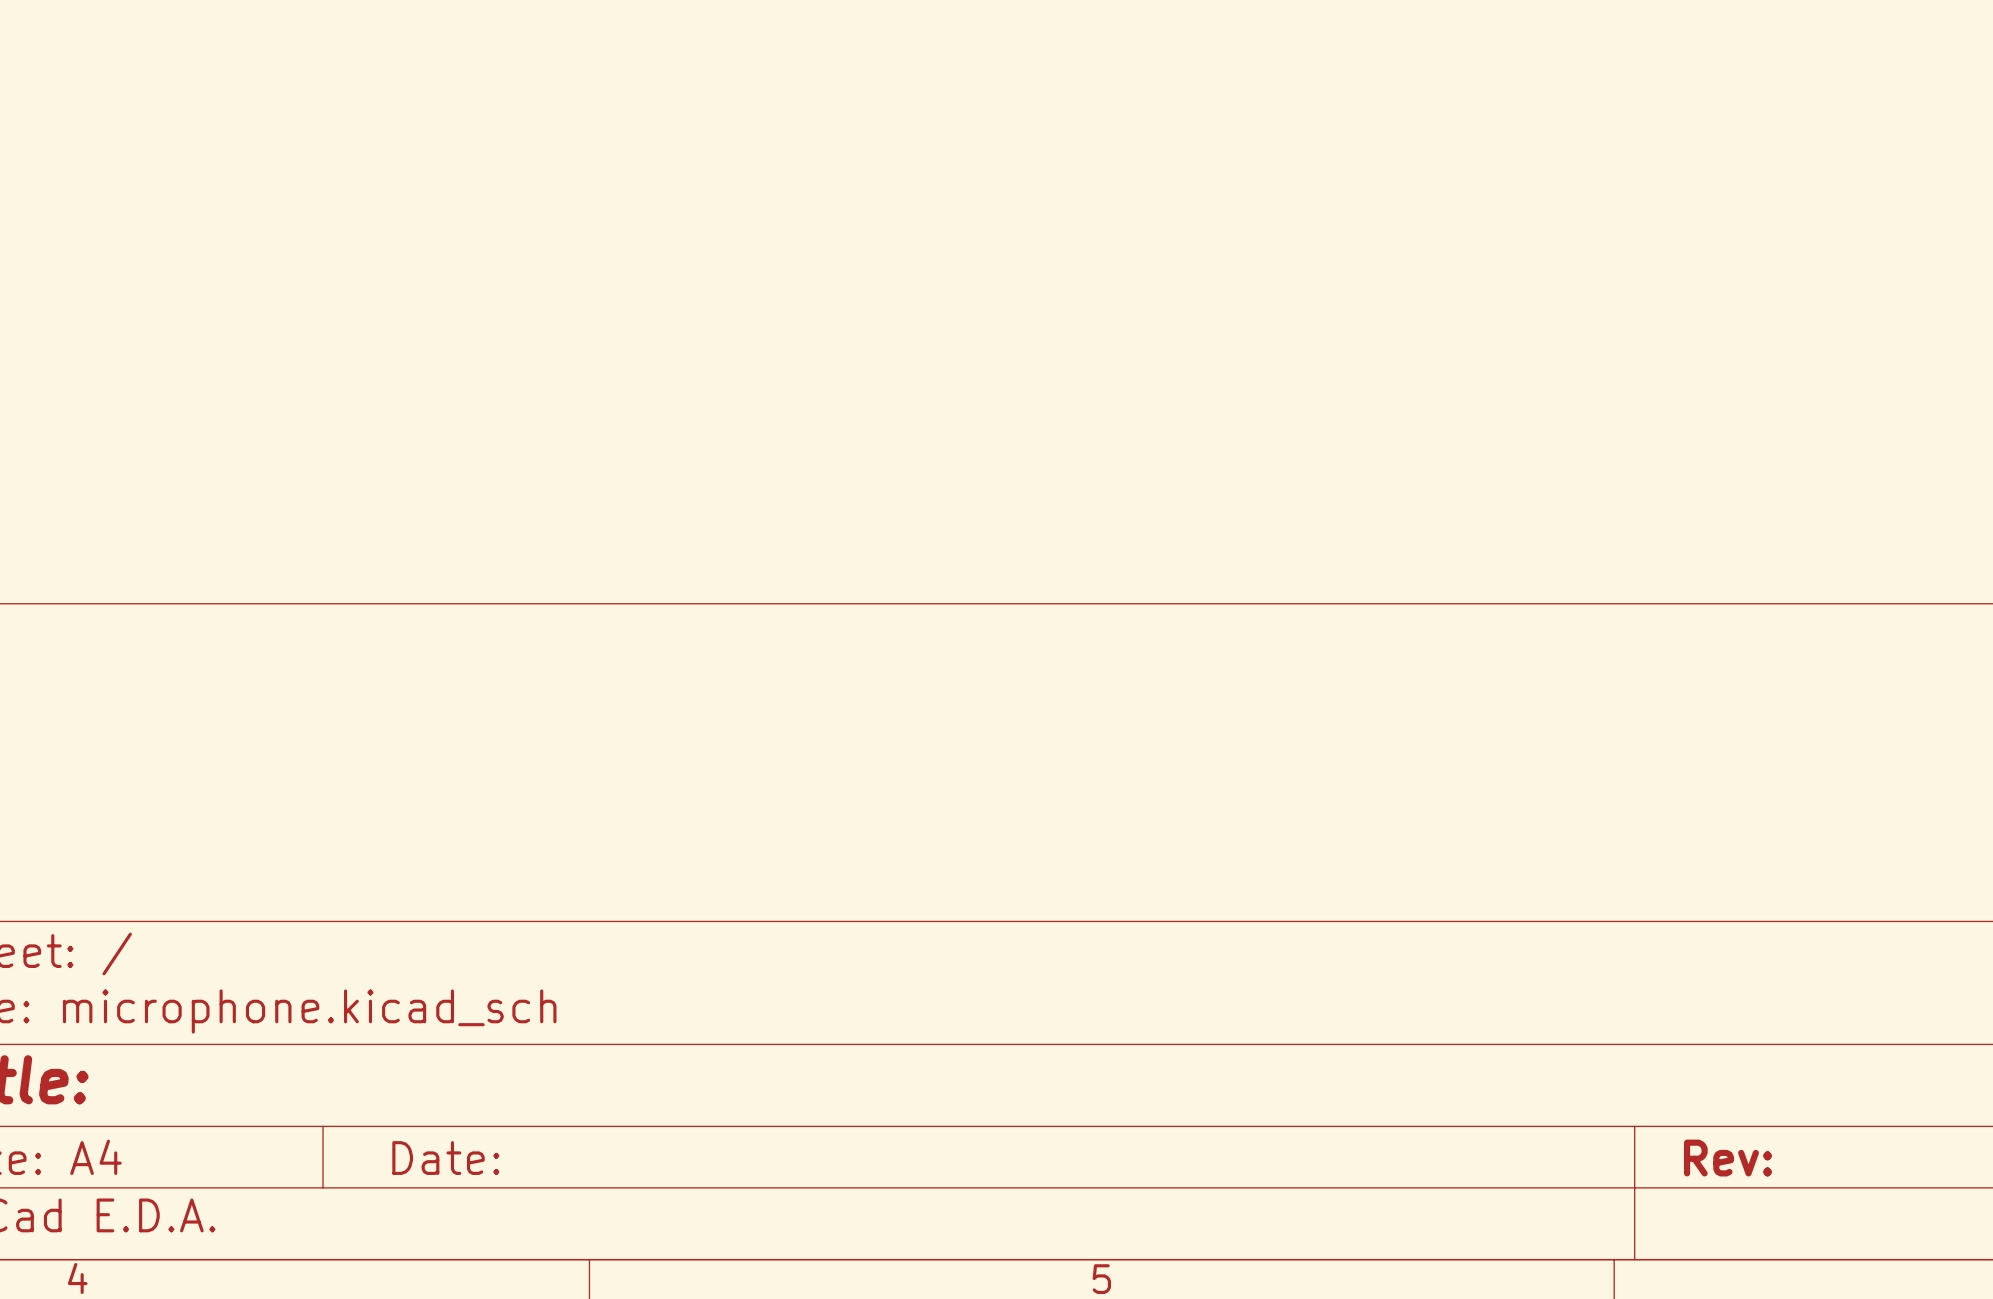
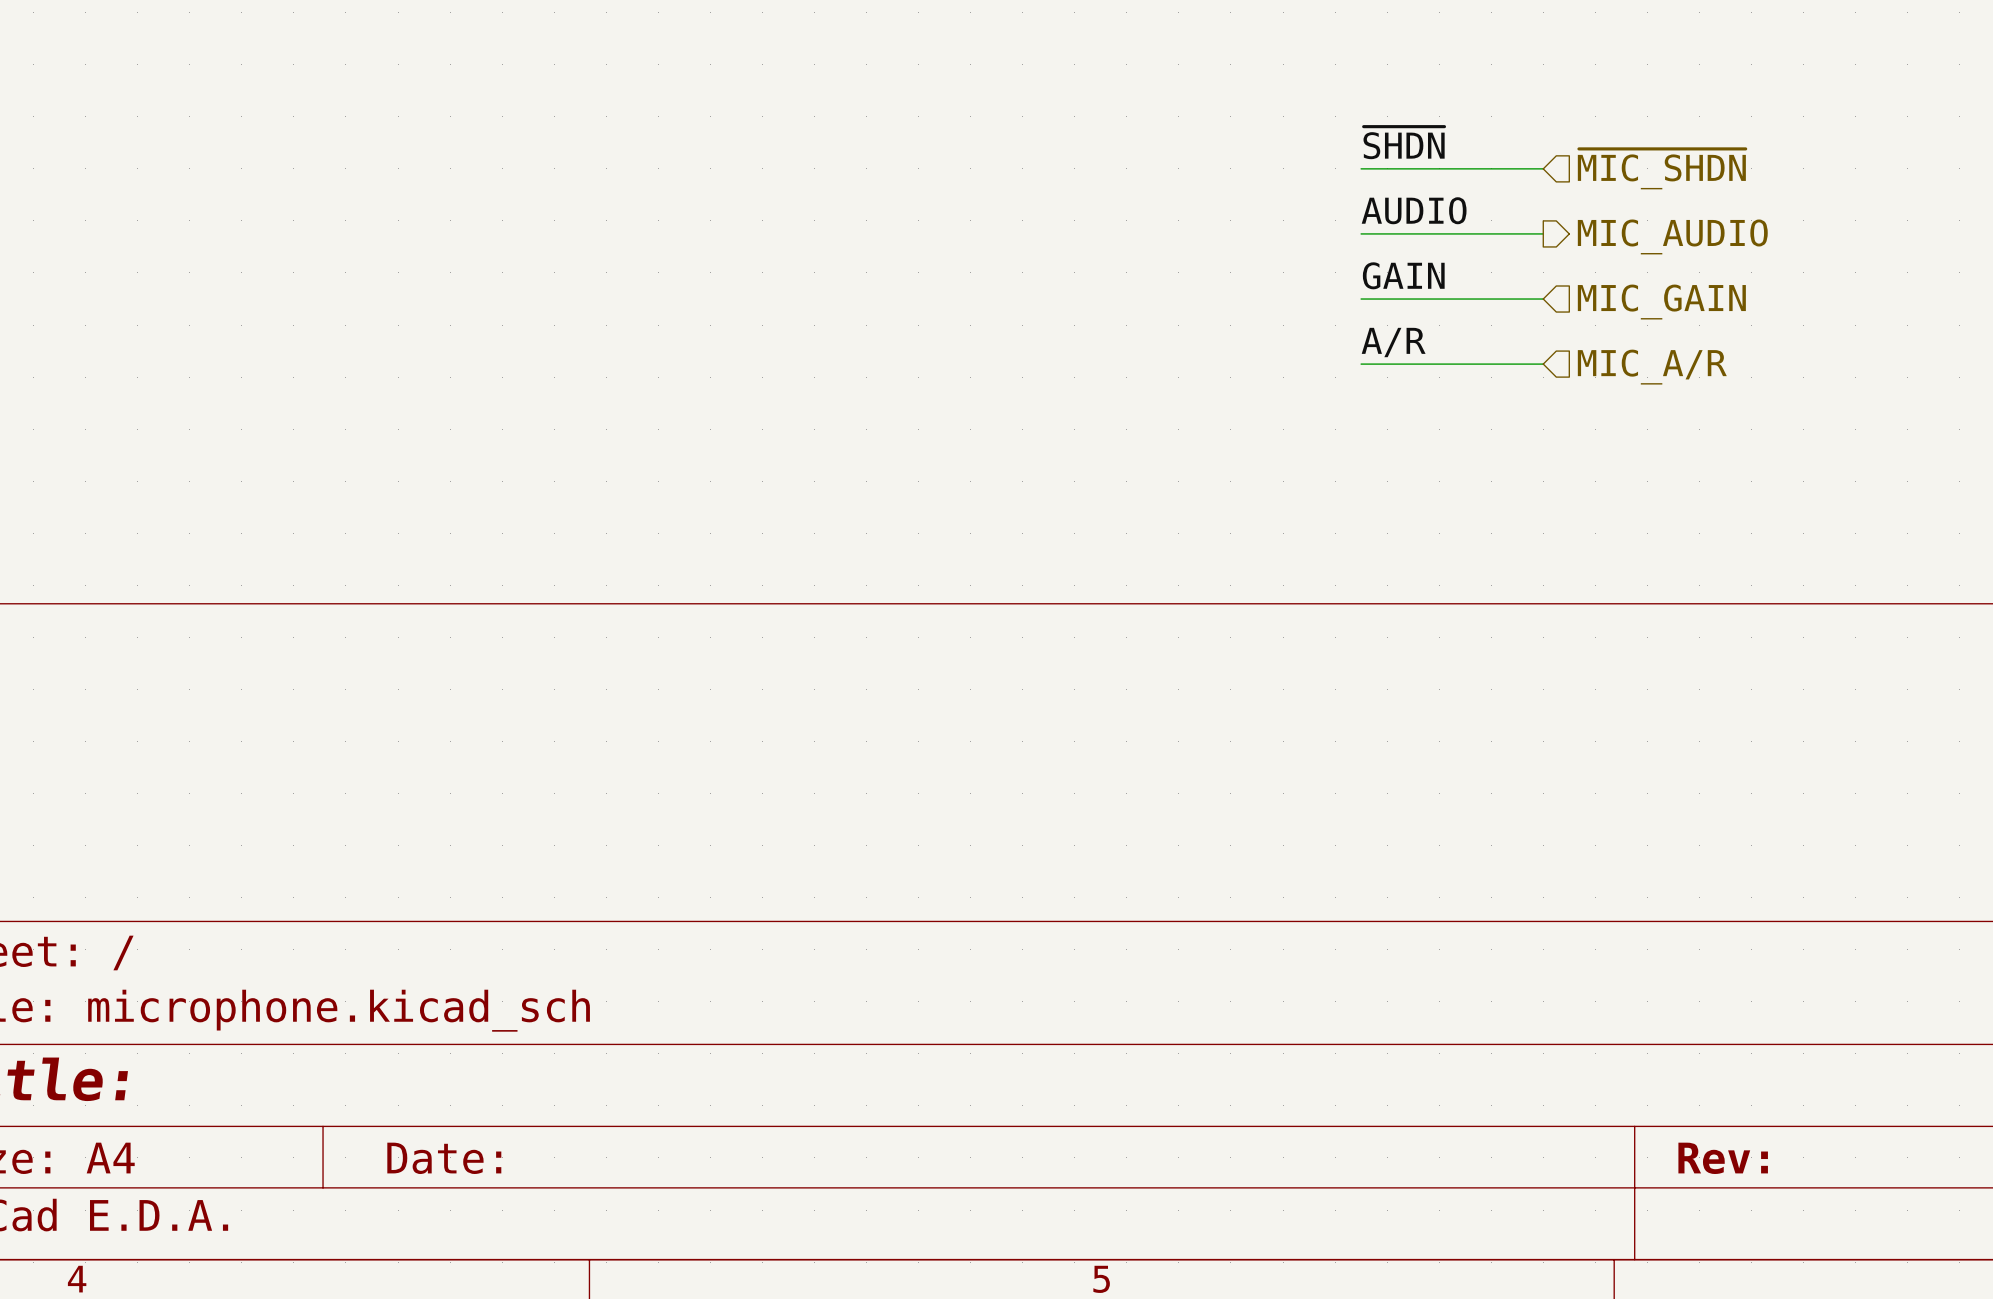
label: none -> ~{SHDN} (1404, 142)
hierarchical label: none -> ~{MIC_SHDN} (1661, 169)
wire: none -> (1361, 168) (1543, 168)
label: none -> AUDIO (1414, 210)
wire: none -> (1361, 233) (1543, 233)
hierarchical label: none -> MIC_AUDIO (1672, 236)
label: none -> GAIN (1403, 275)
wire: none -> (1361, 299) (1543, 299)
hierarchical label: none -> MIC_GAIN (1661, 302)
label: none -> A/R (1393, 342)
wire: none -> (1361, 364) (1543, 364)
hierarchical label: none -> MIC_A/R (1652, 367)

